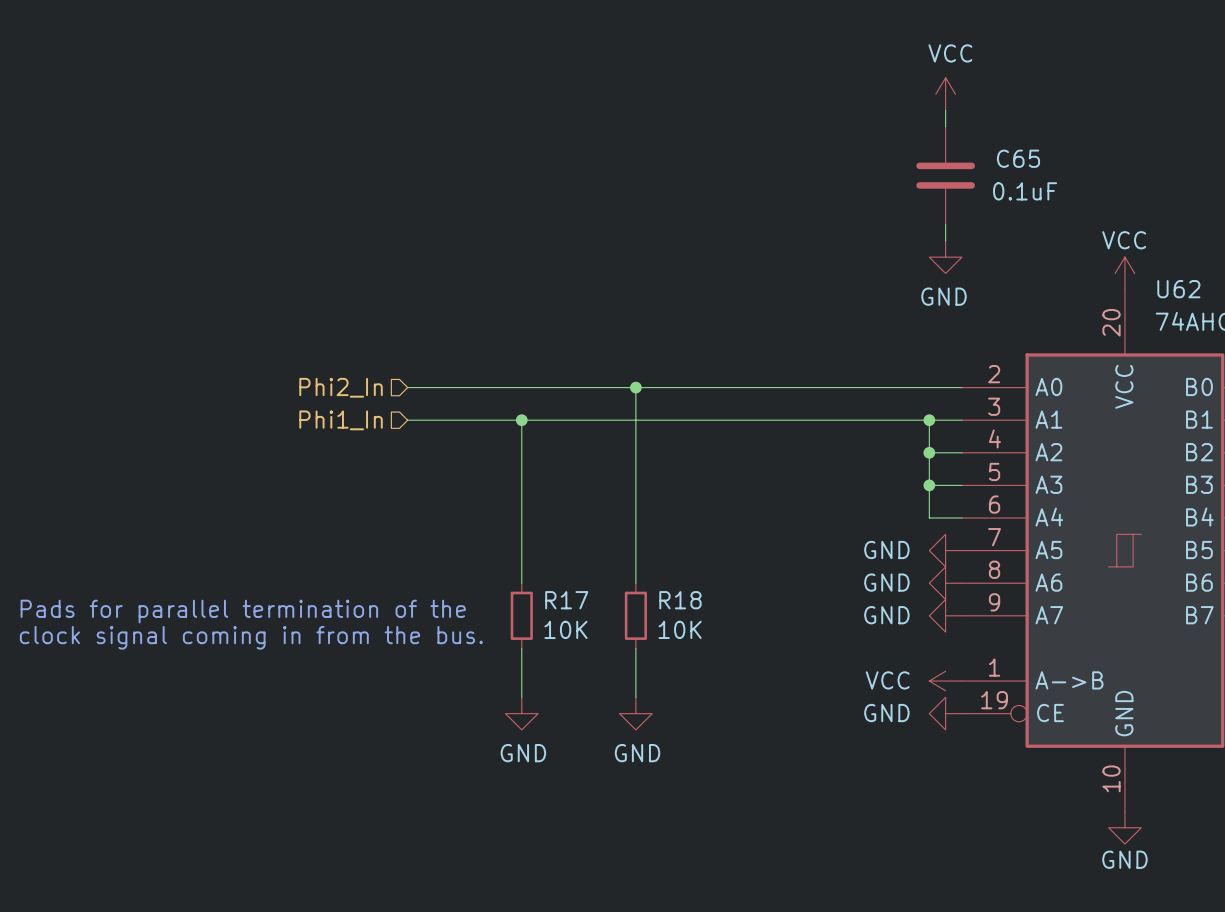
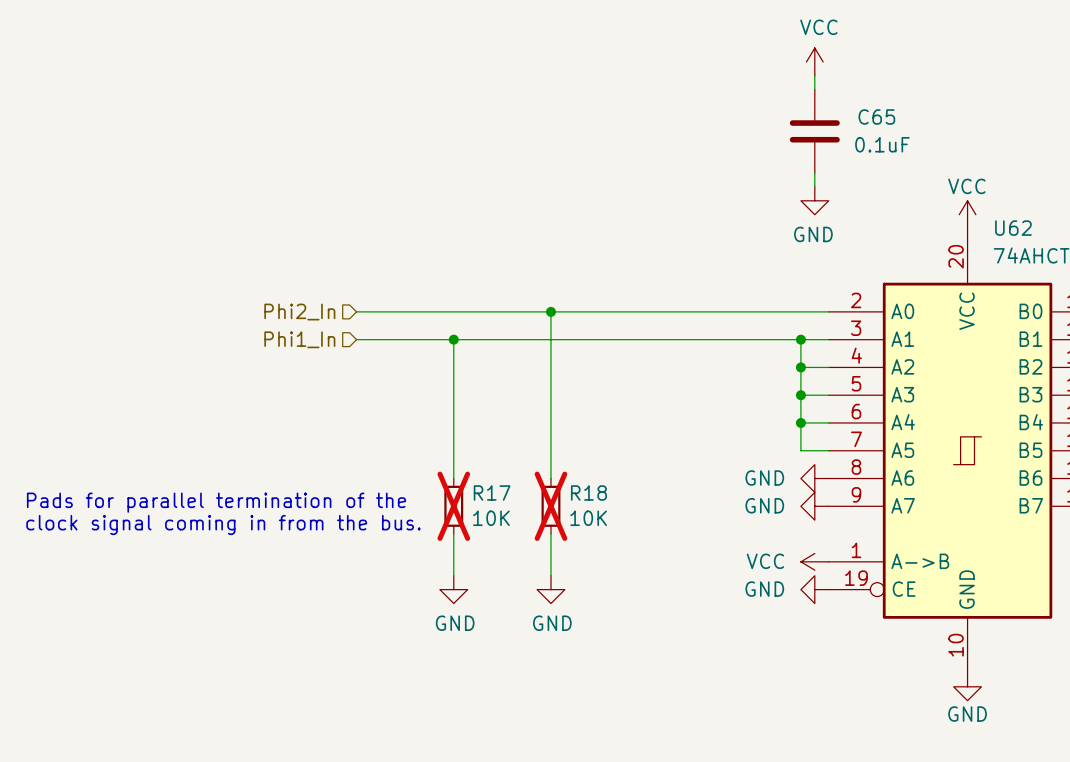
wire: none -> (800, 422) (800, 450) (828, 450)
junction: none -> (800, 422)
power symbol: GND (945, 550) -> none
R17 do-not-place cross: none -> (453, 506)
R18 do-not-place cross: none -> (550, 506)

